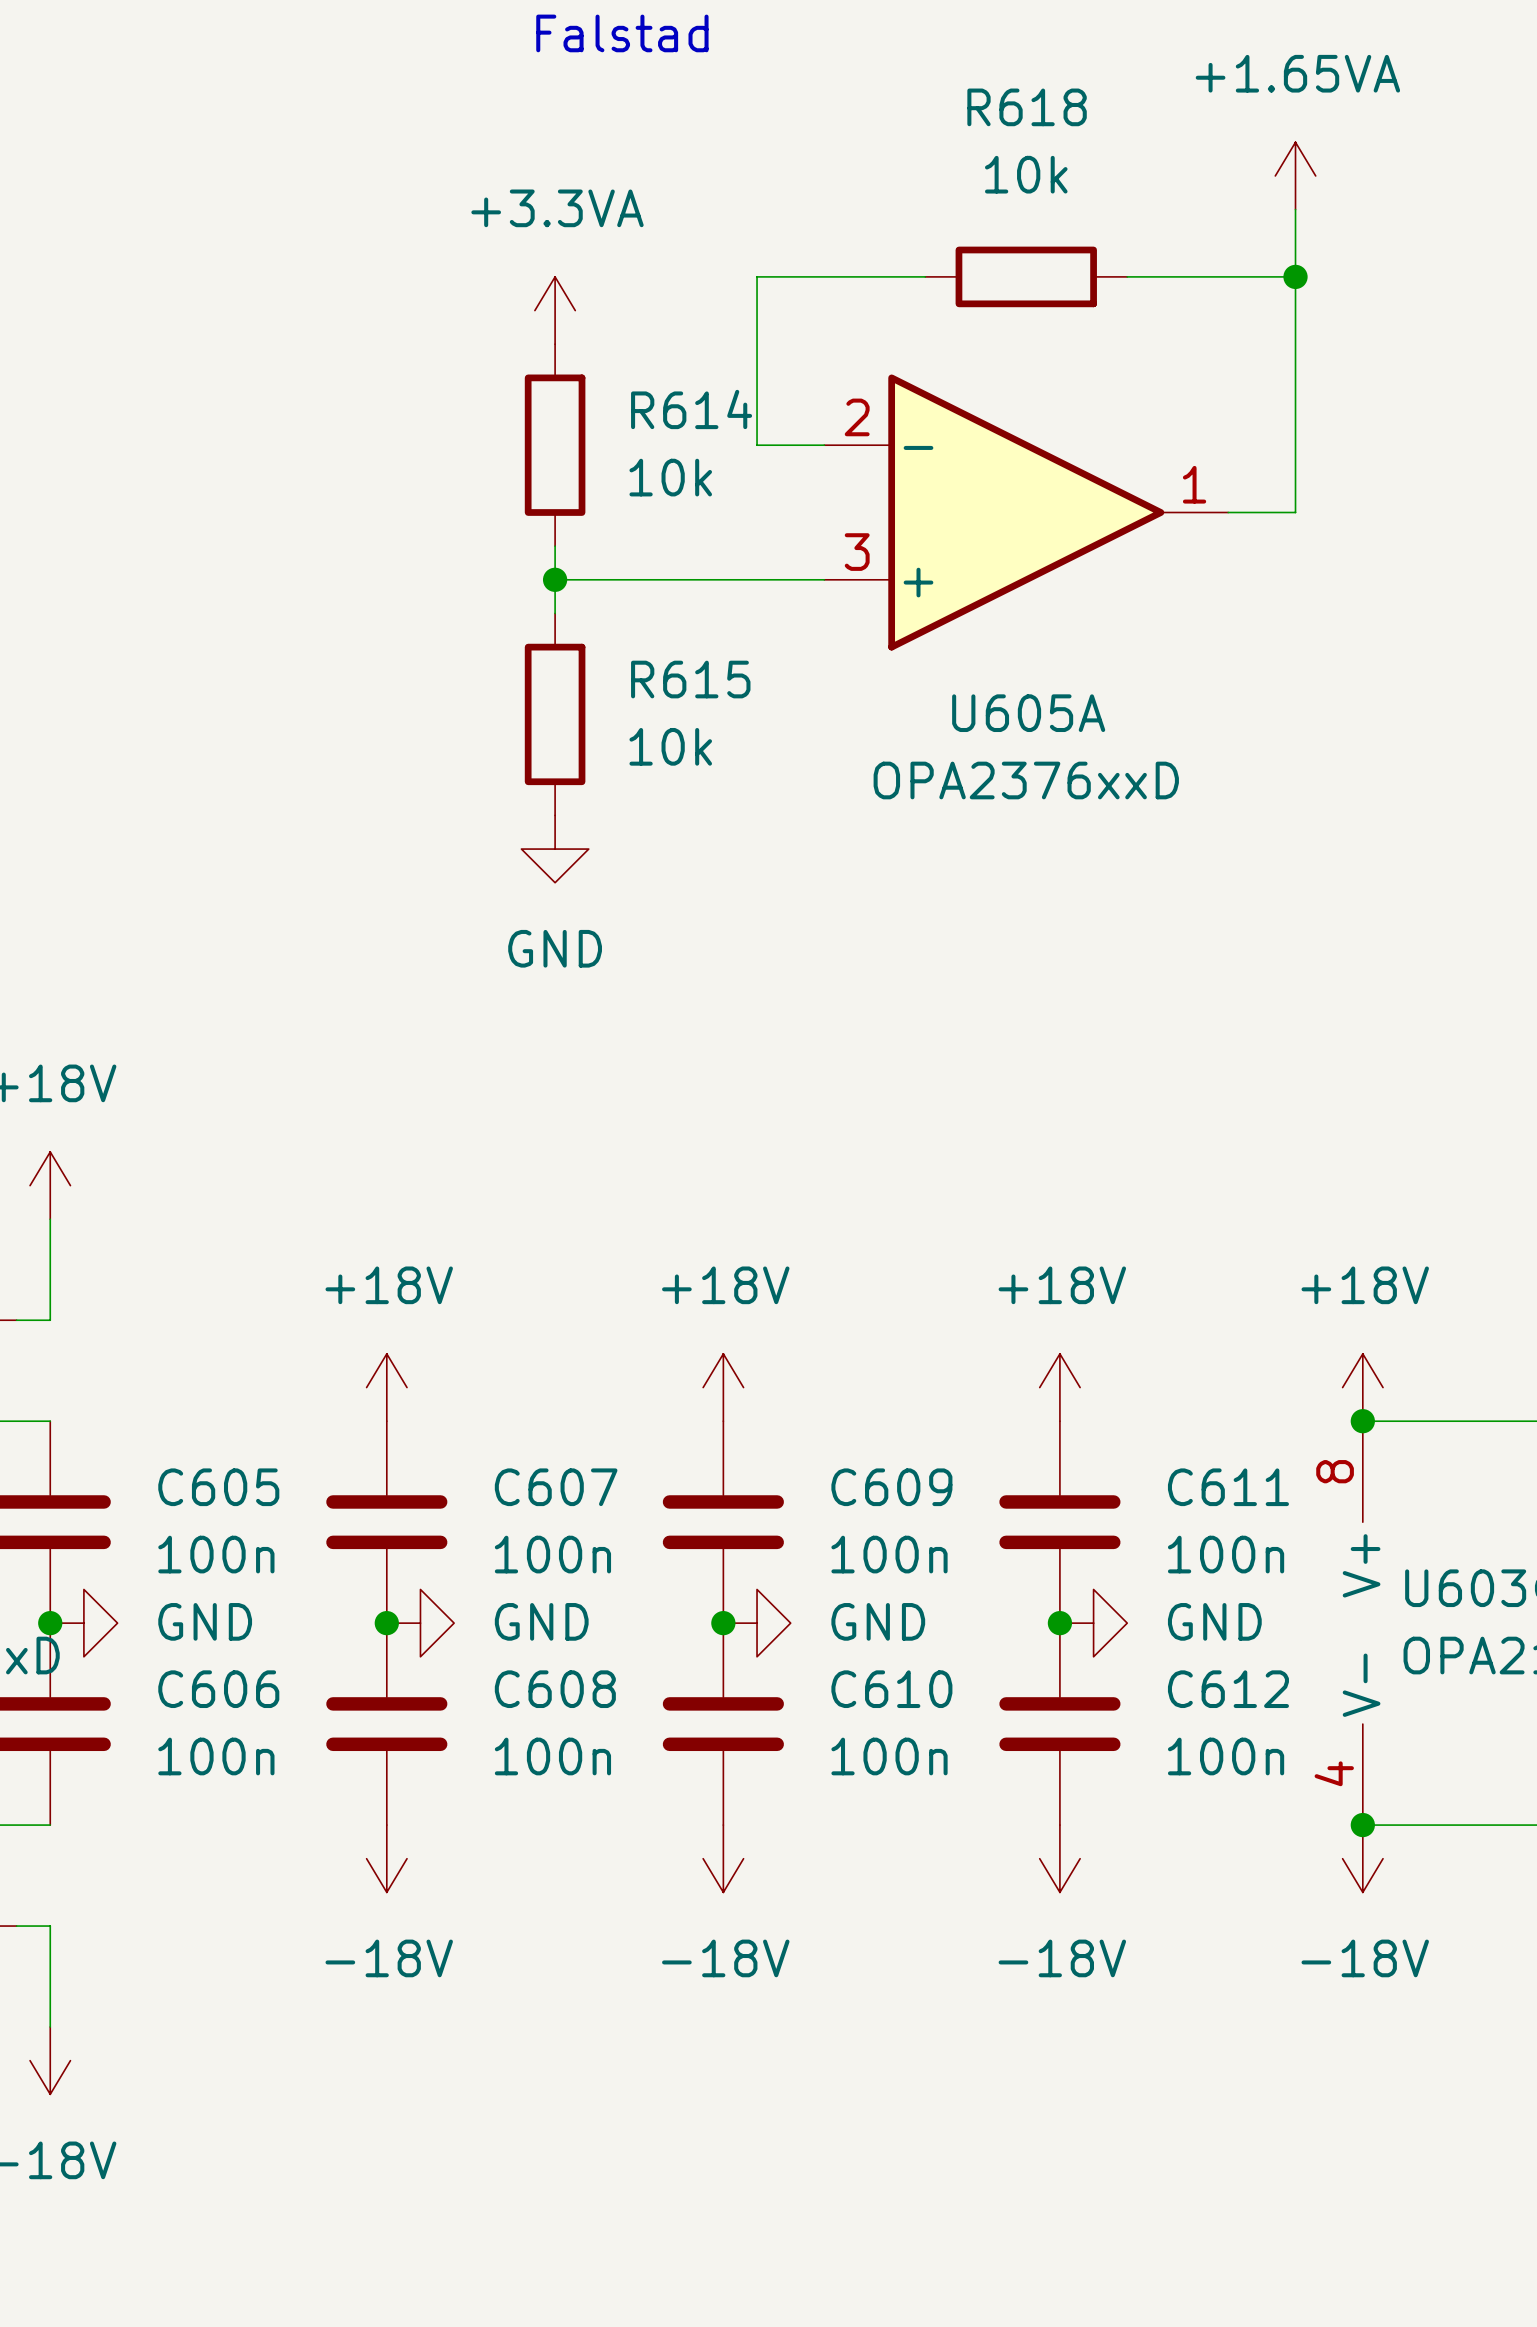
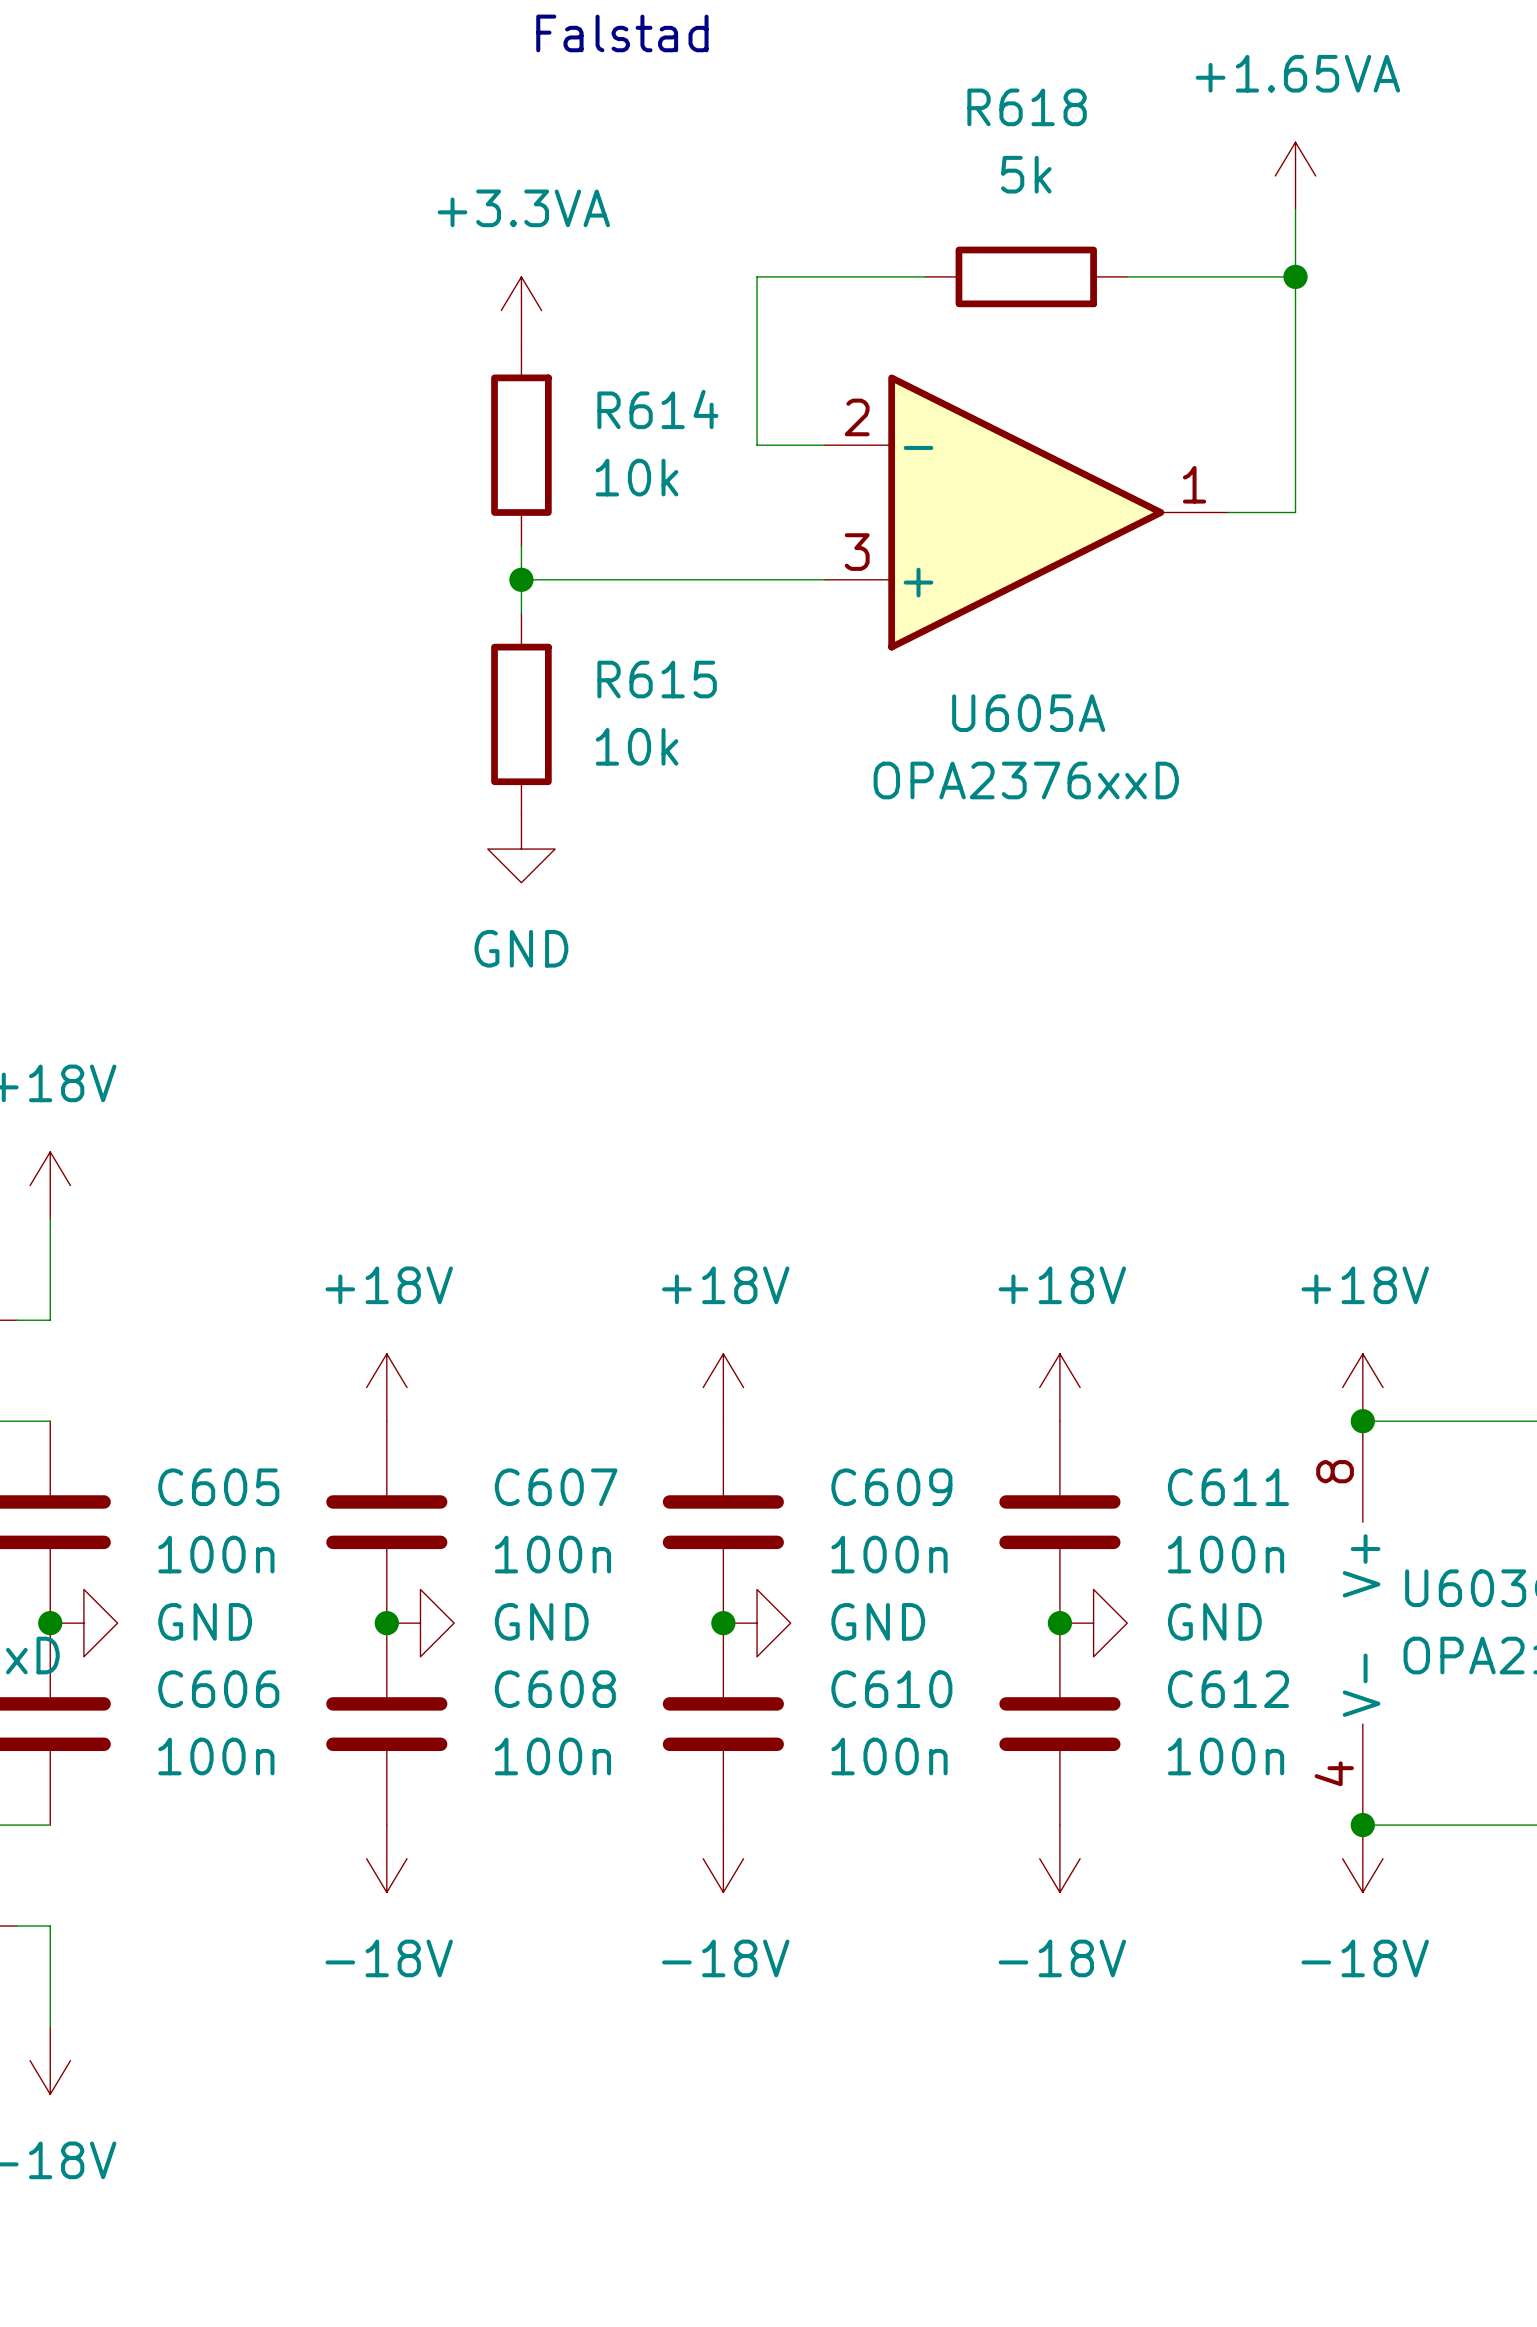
R618 value: 10k (1026, 174) -> 5k (1026, 174)
power symbol position: +3.3VA (555, 310) -> +3.3VA (521, 310)
R614 position: (555, 445) -> (521, 445)
wire: (555, 546) (555, 613) -> (521, 546) (521, 613)
wire: none -> (521, 579) (555, 579)
junction position: (555, 579) -> (521, 579)
R615 position: (555, 714) -> (521, 714)
power symbol position: GND (555, 849) -> GND (521, 849)

